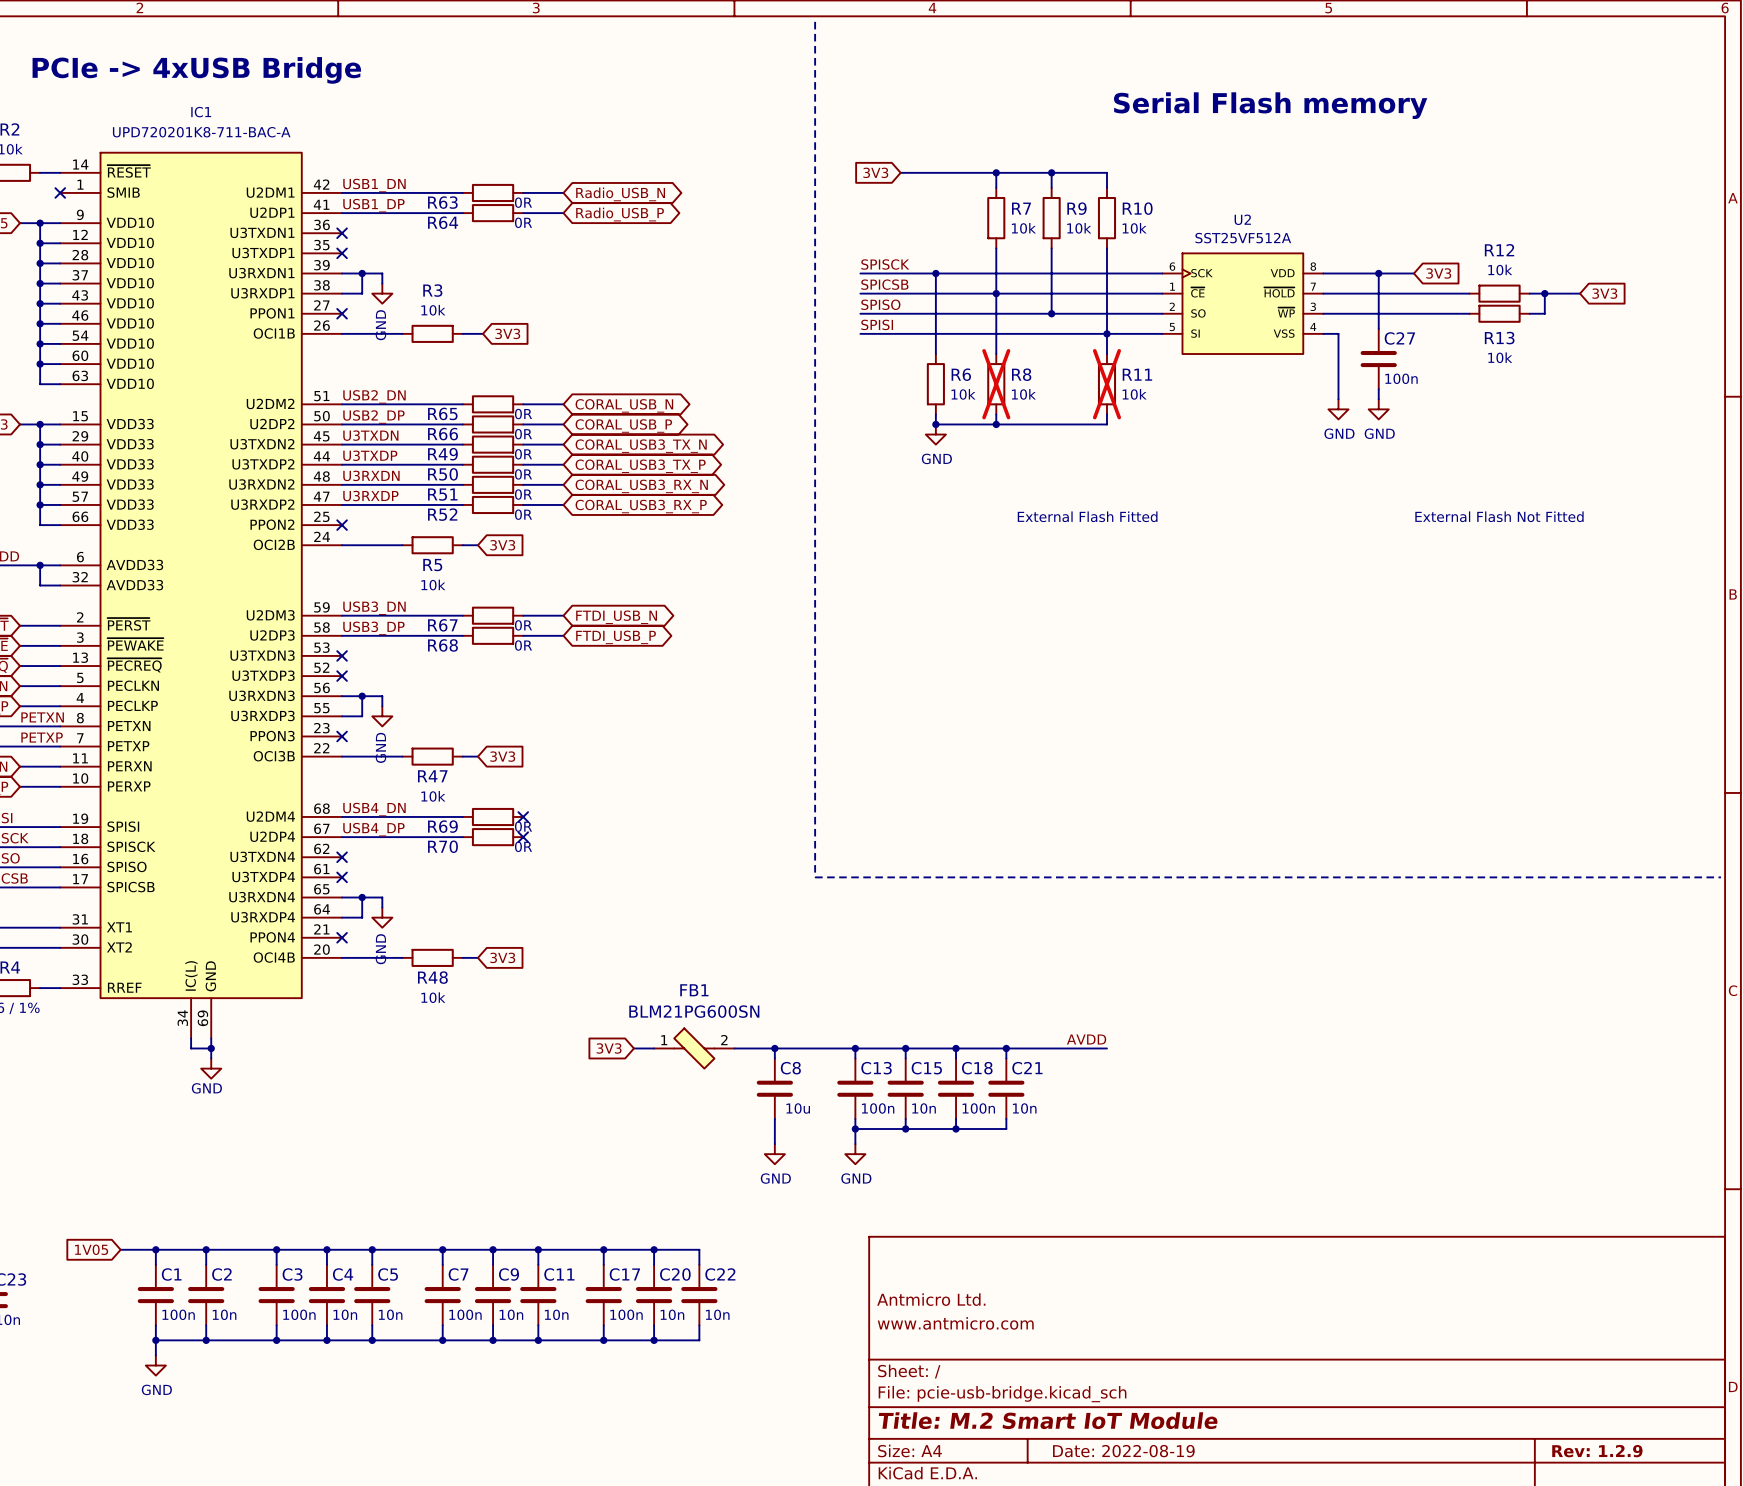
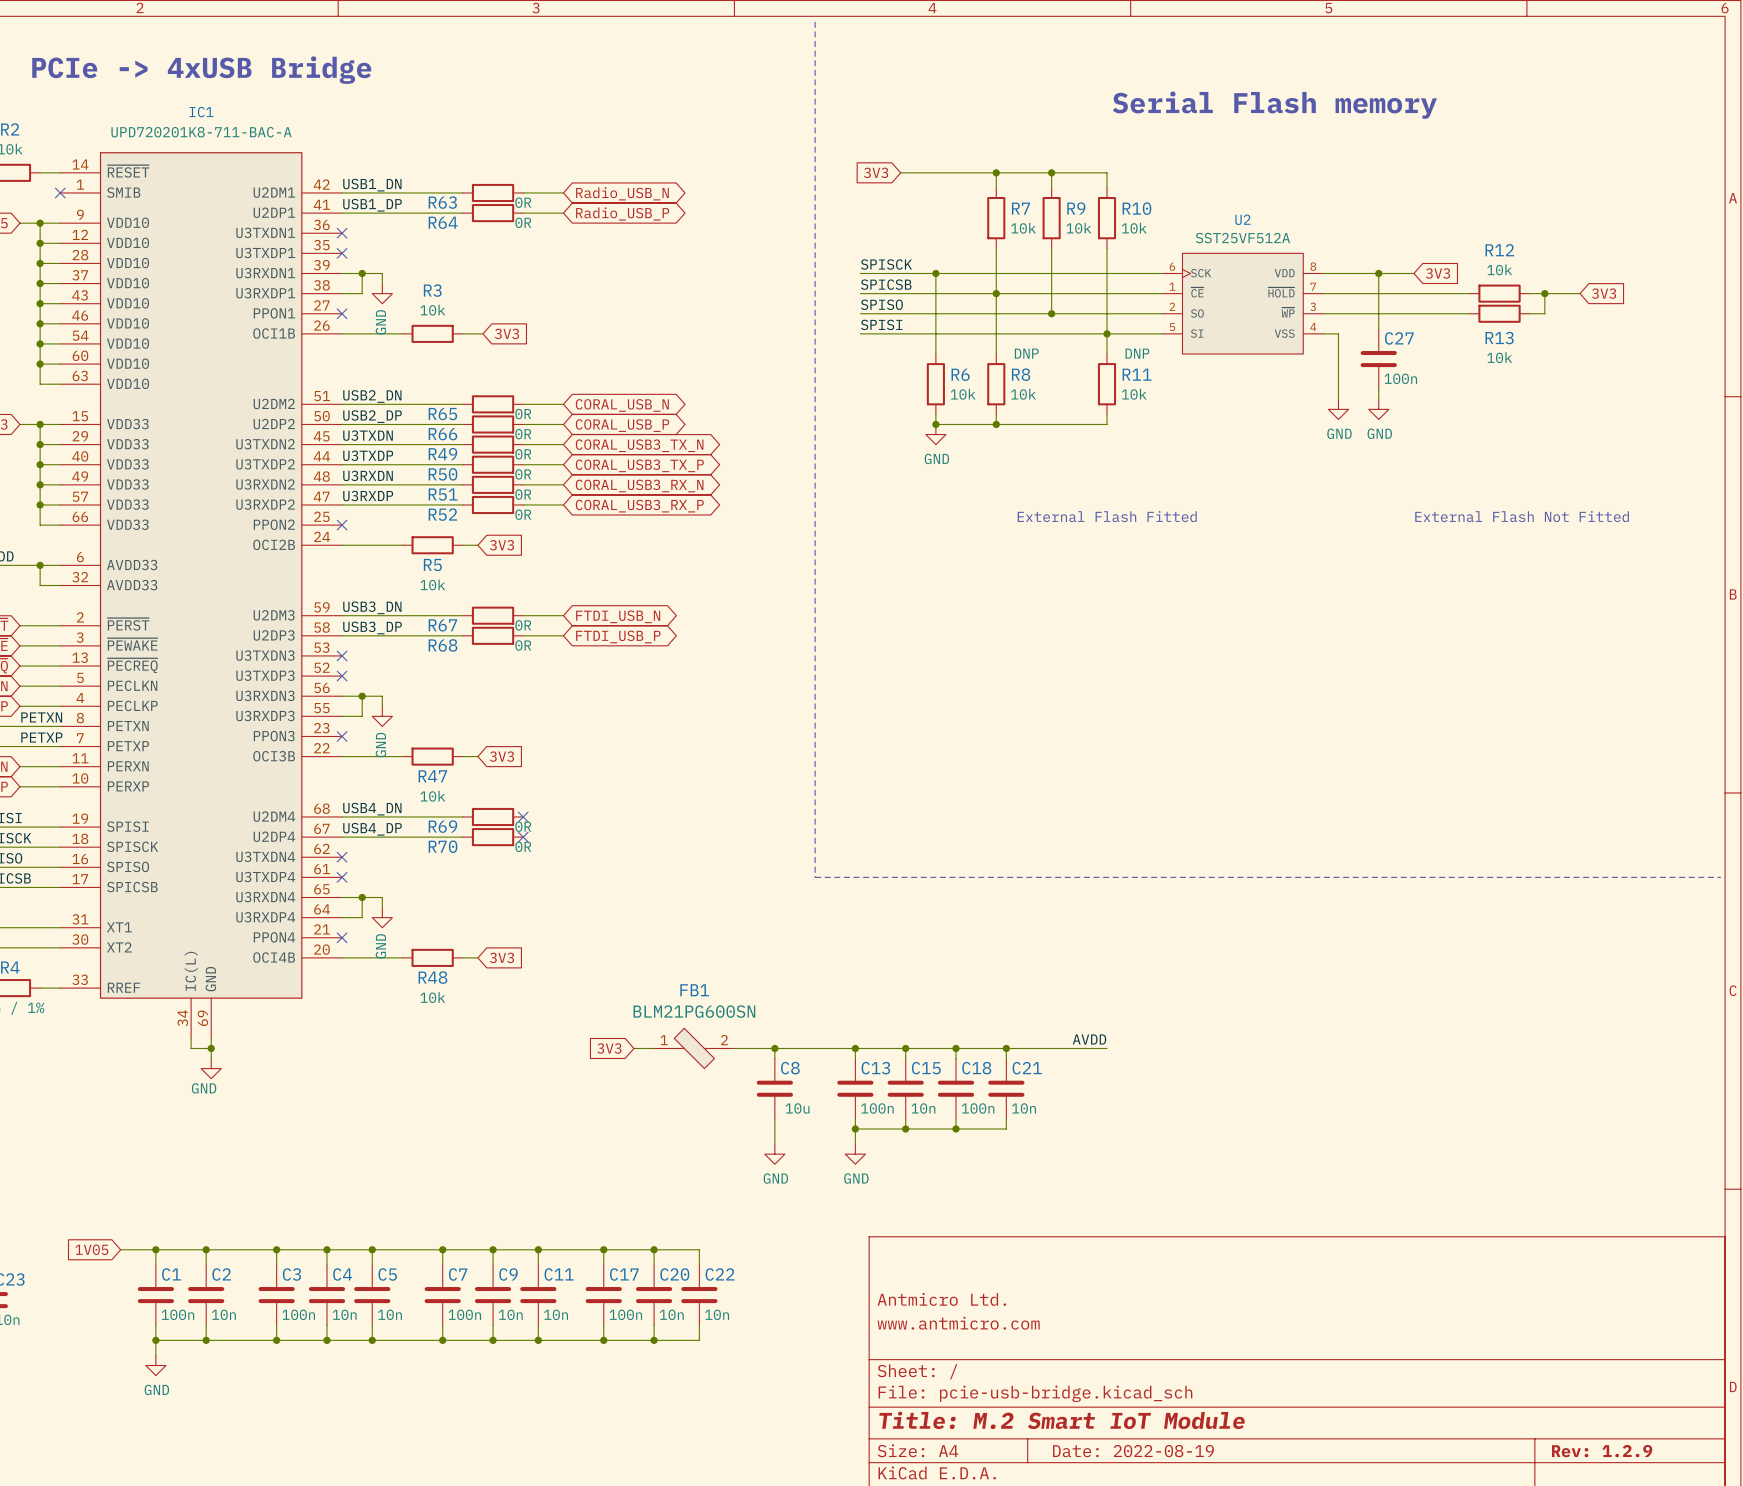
R8 text: none -> DNP (1026, 353)
R11 text: none -> DNP (1137, 353)
R8 do-not-place cross: (996, 384) -> none
R11 do-not-place cross: (1106, 384) -> none

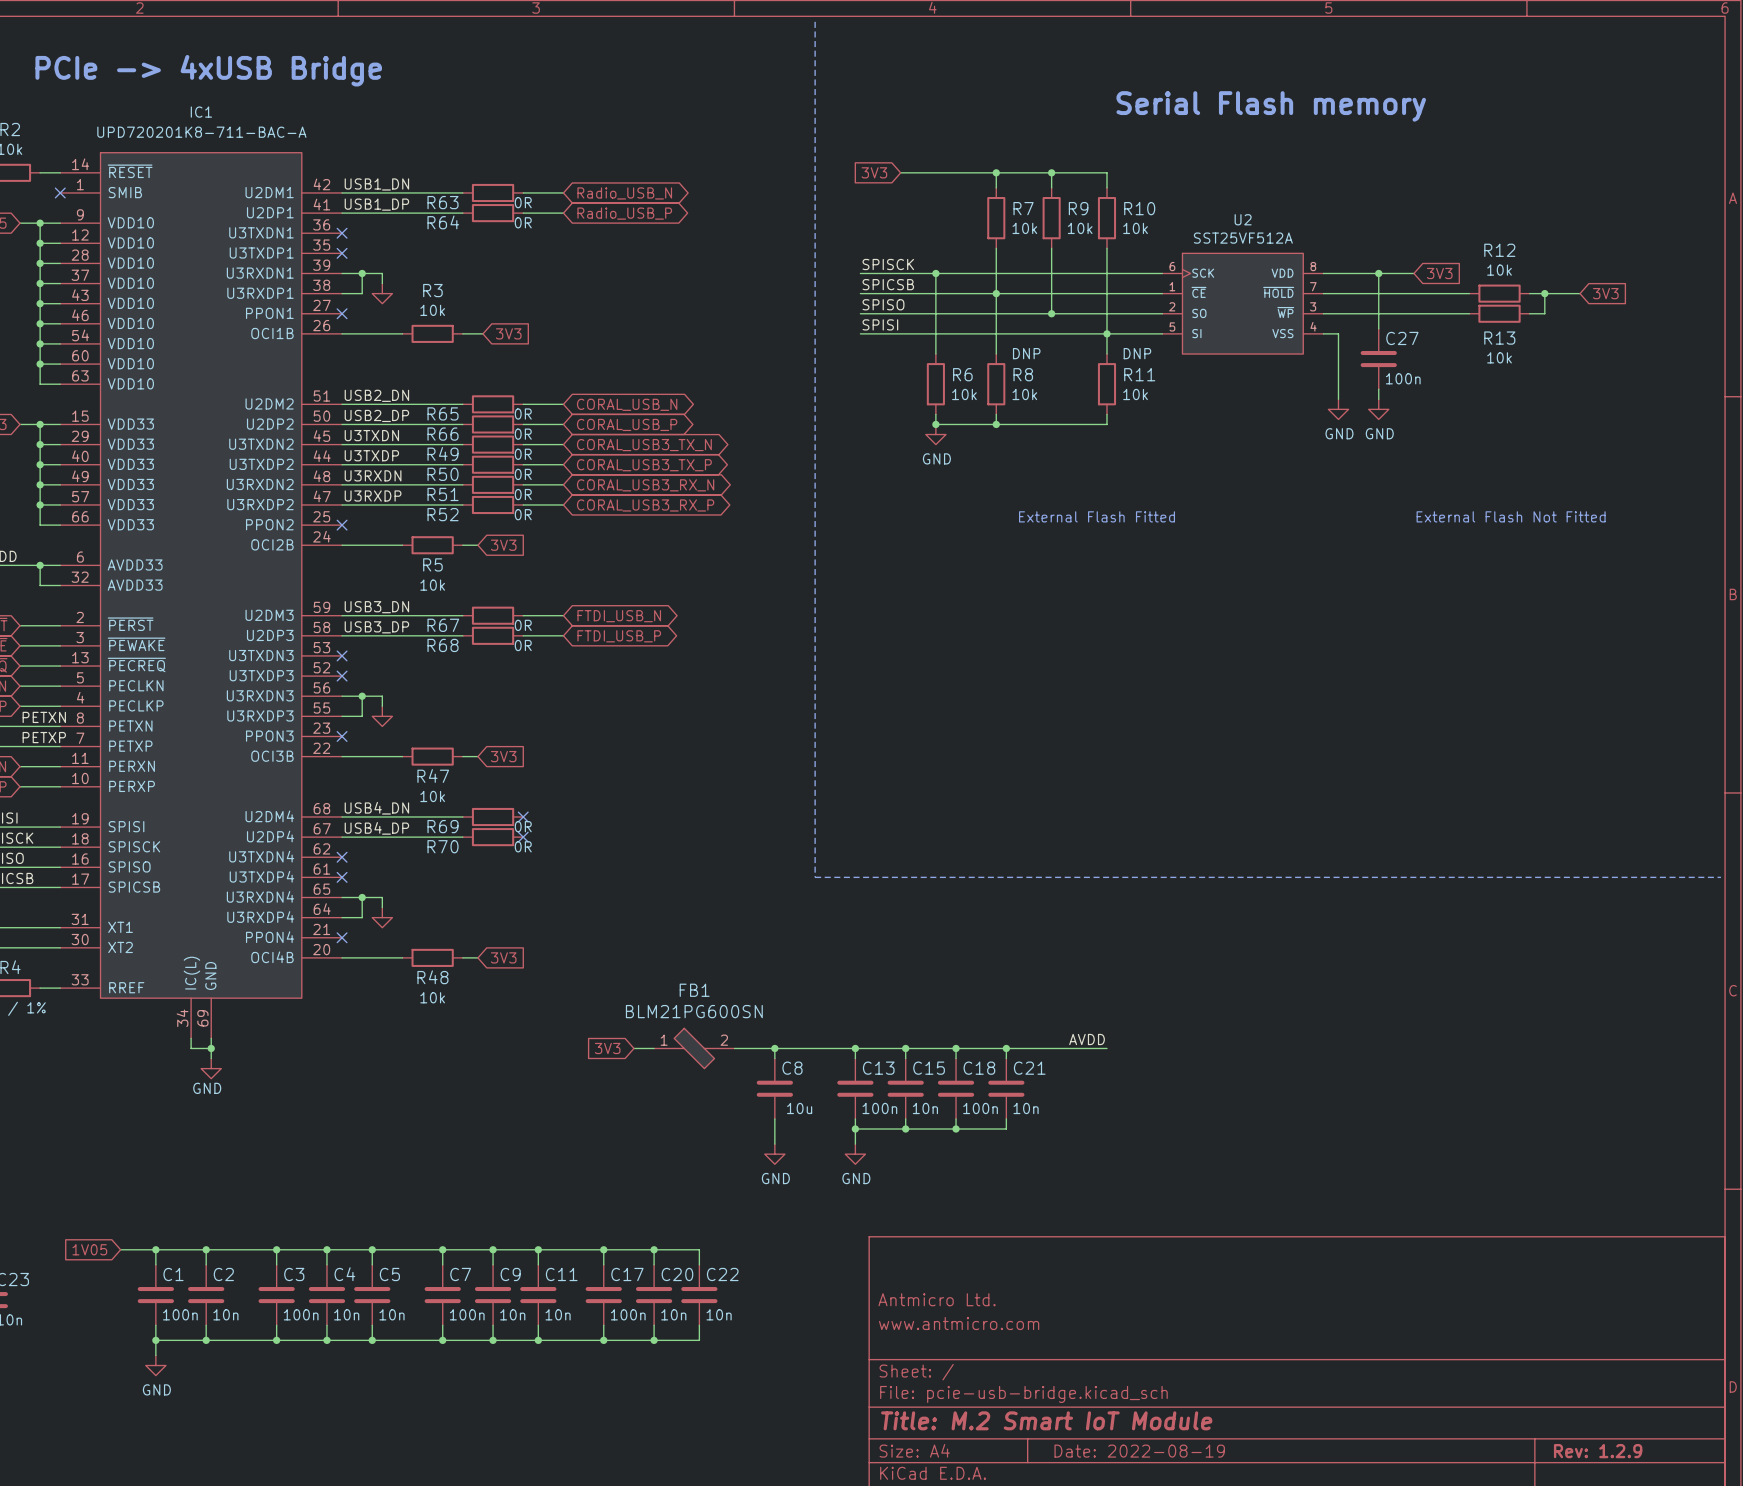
power symbol text: GND (380, 322) -> none
power symbol text: GND (380, 745) -> none
power symbol text: GND (380, 946) -> none

